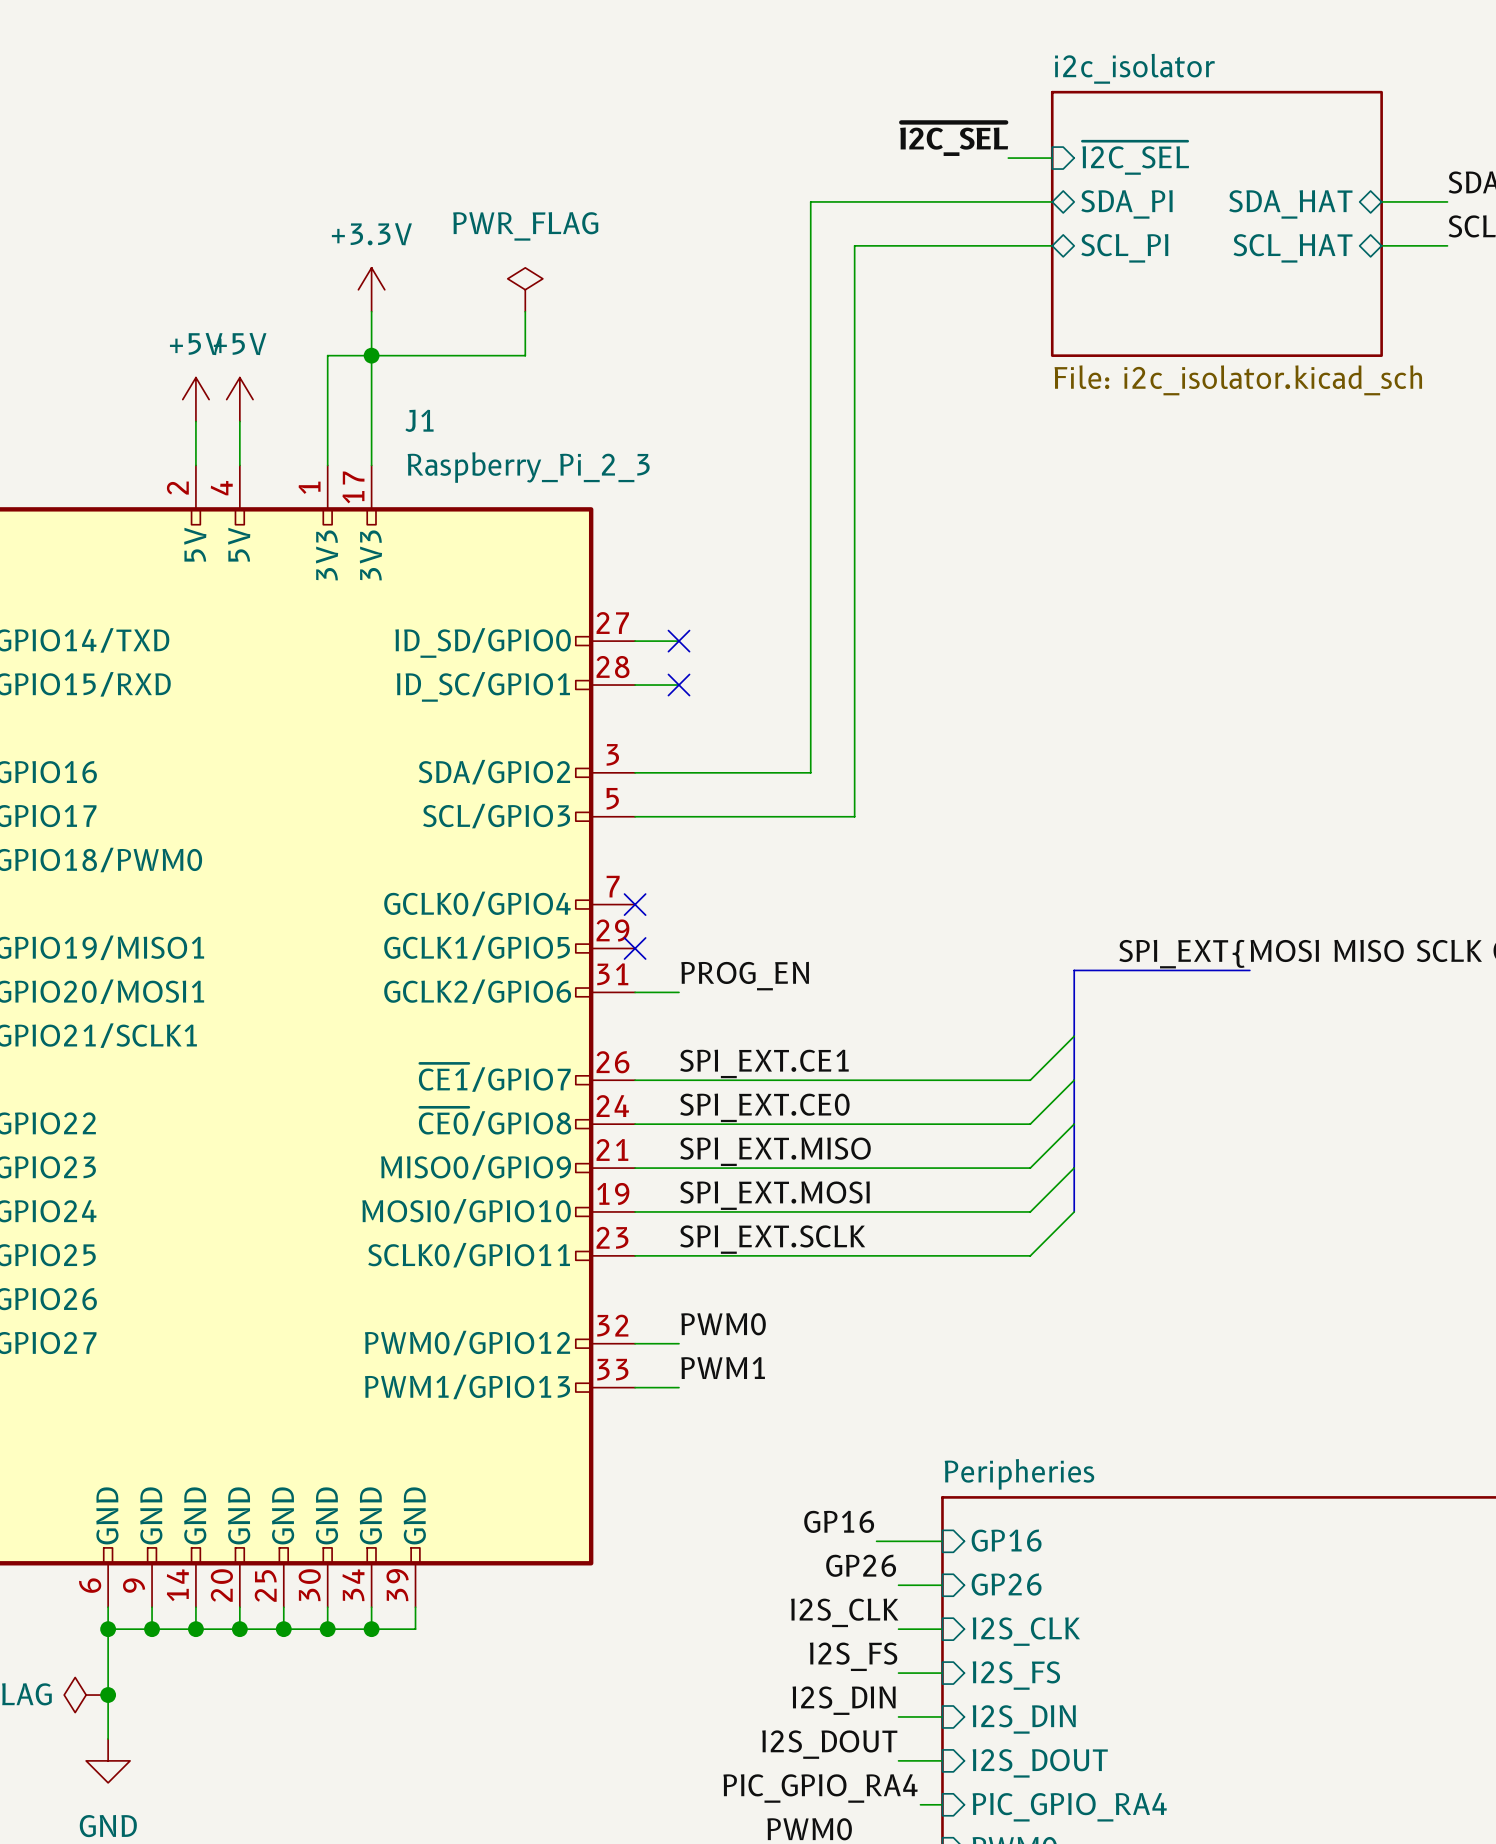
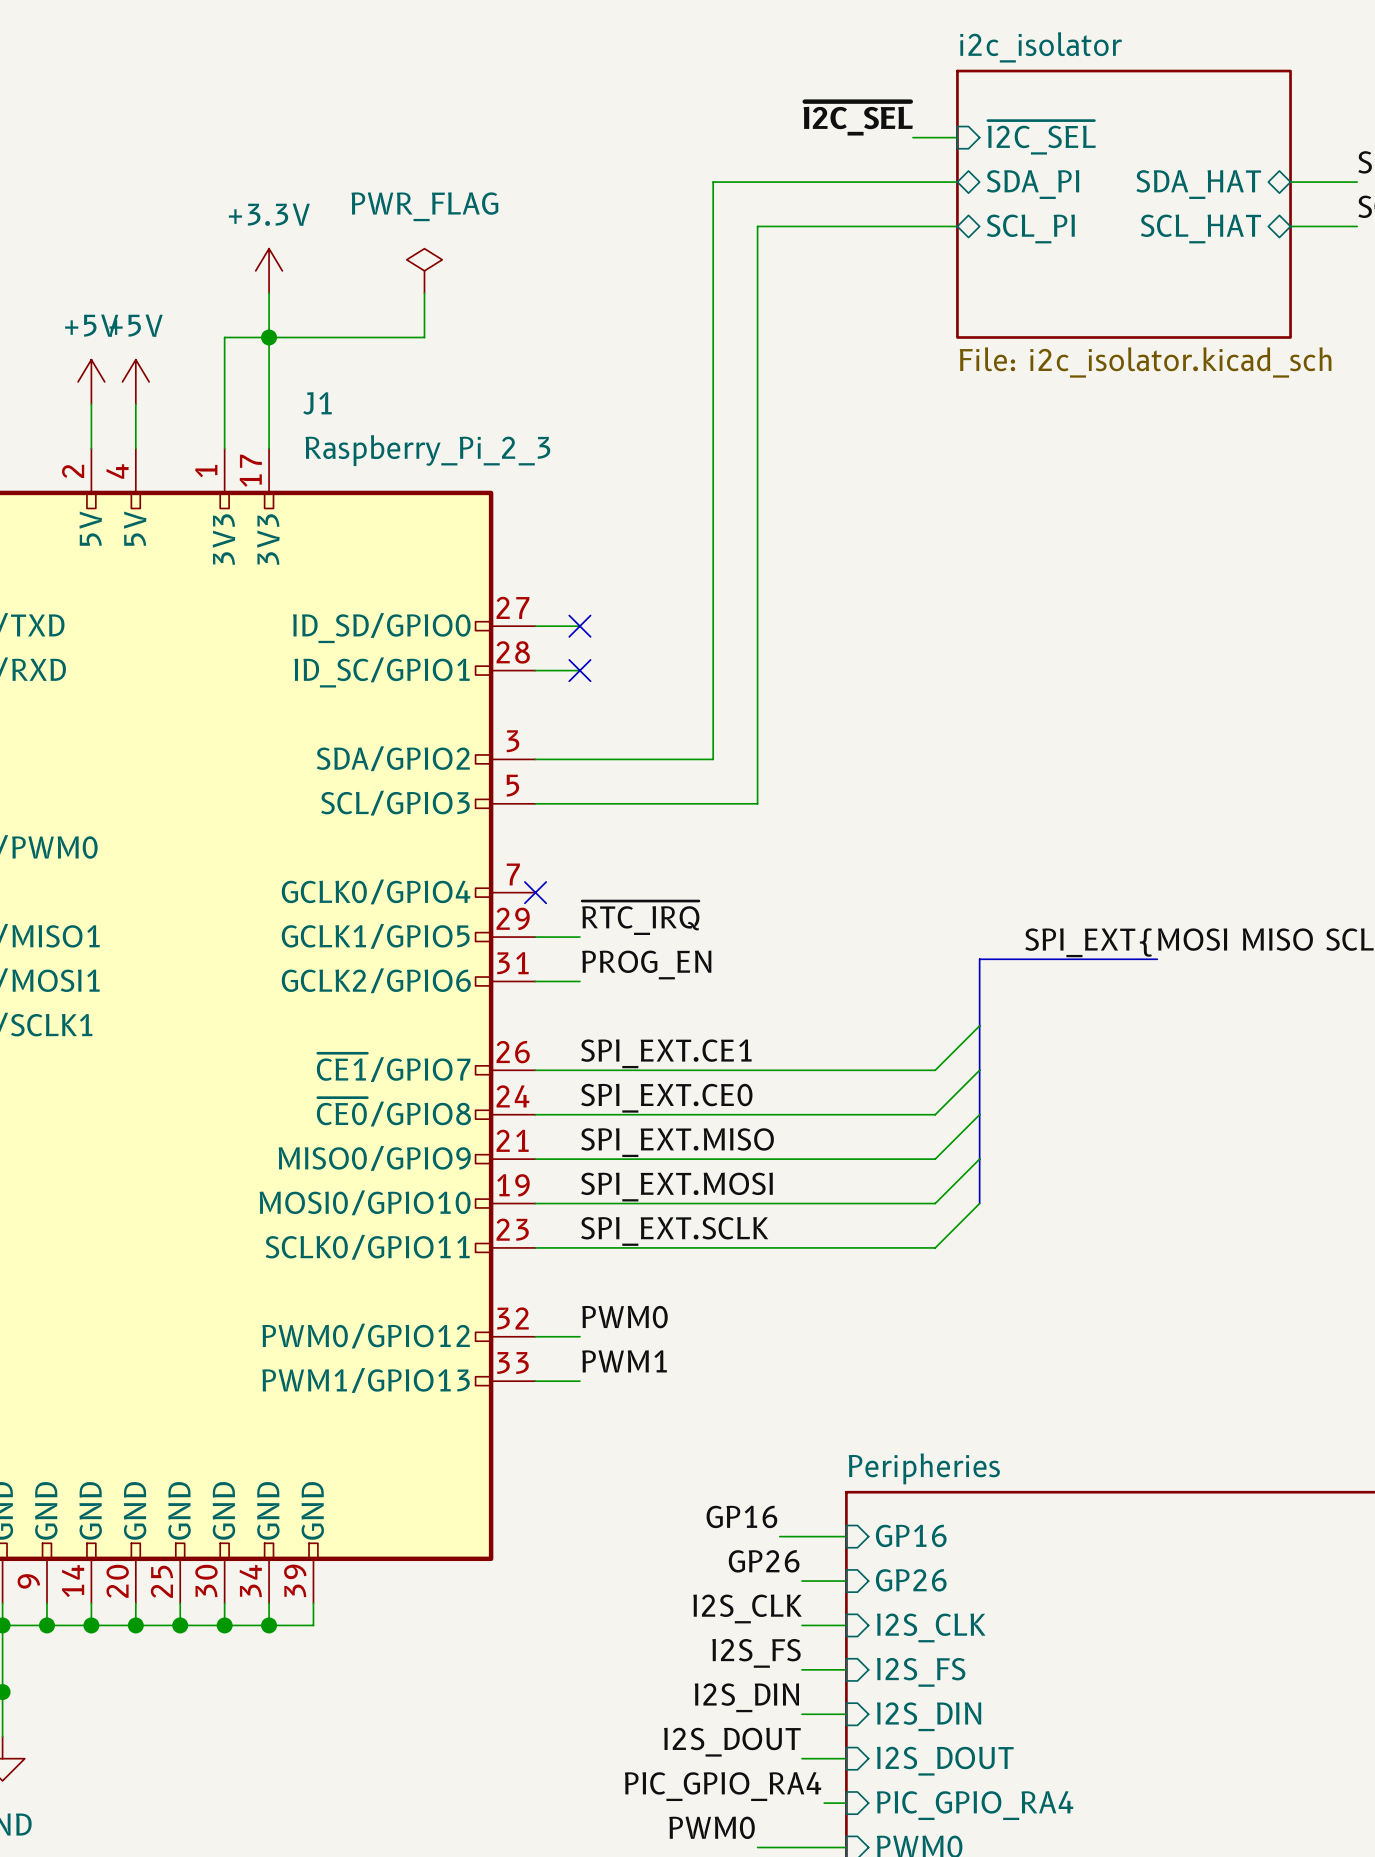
label: none -> ~{RTC_IRQ} (640, 918)
wire: none -> (535, 937) (579, 937)
no-connect mark: (635, 948) -> none

